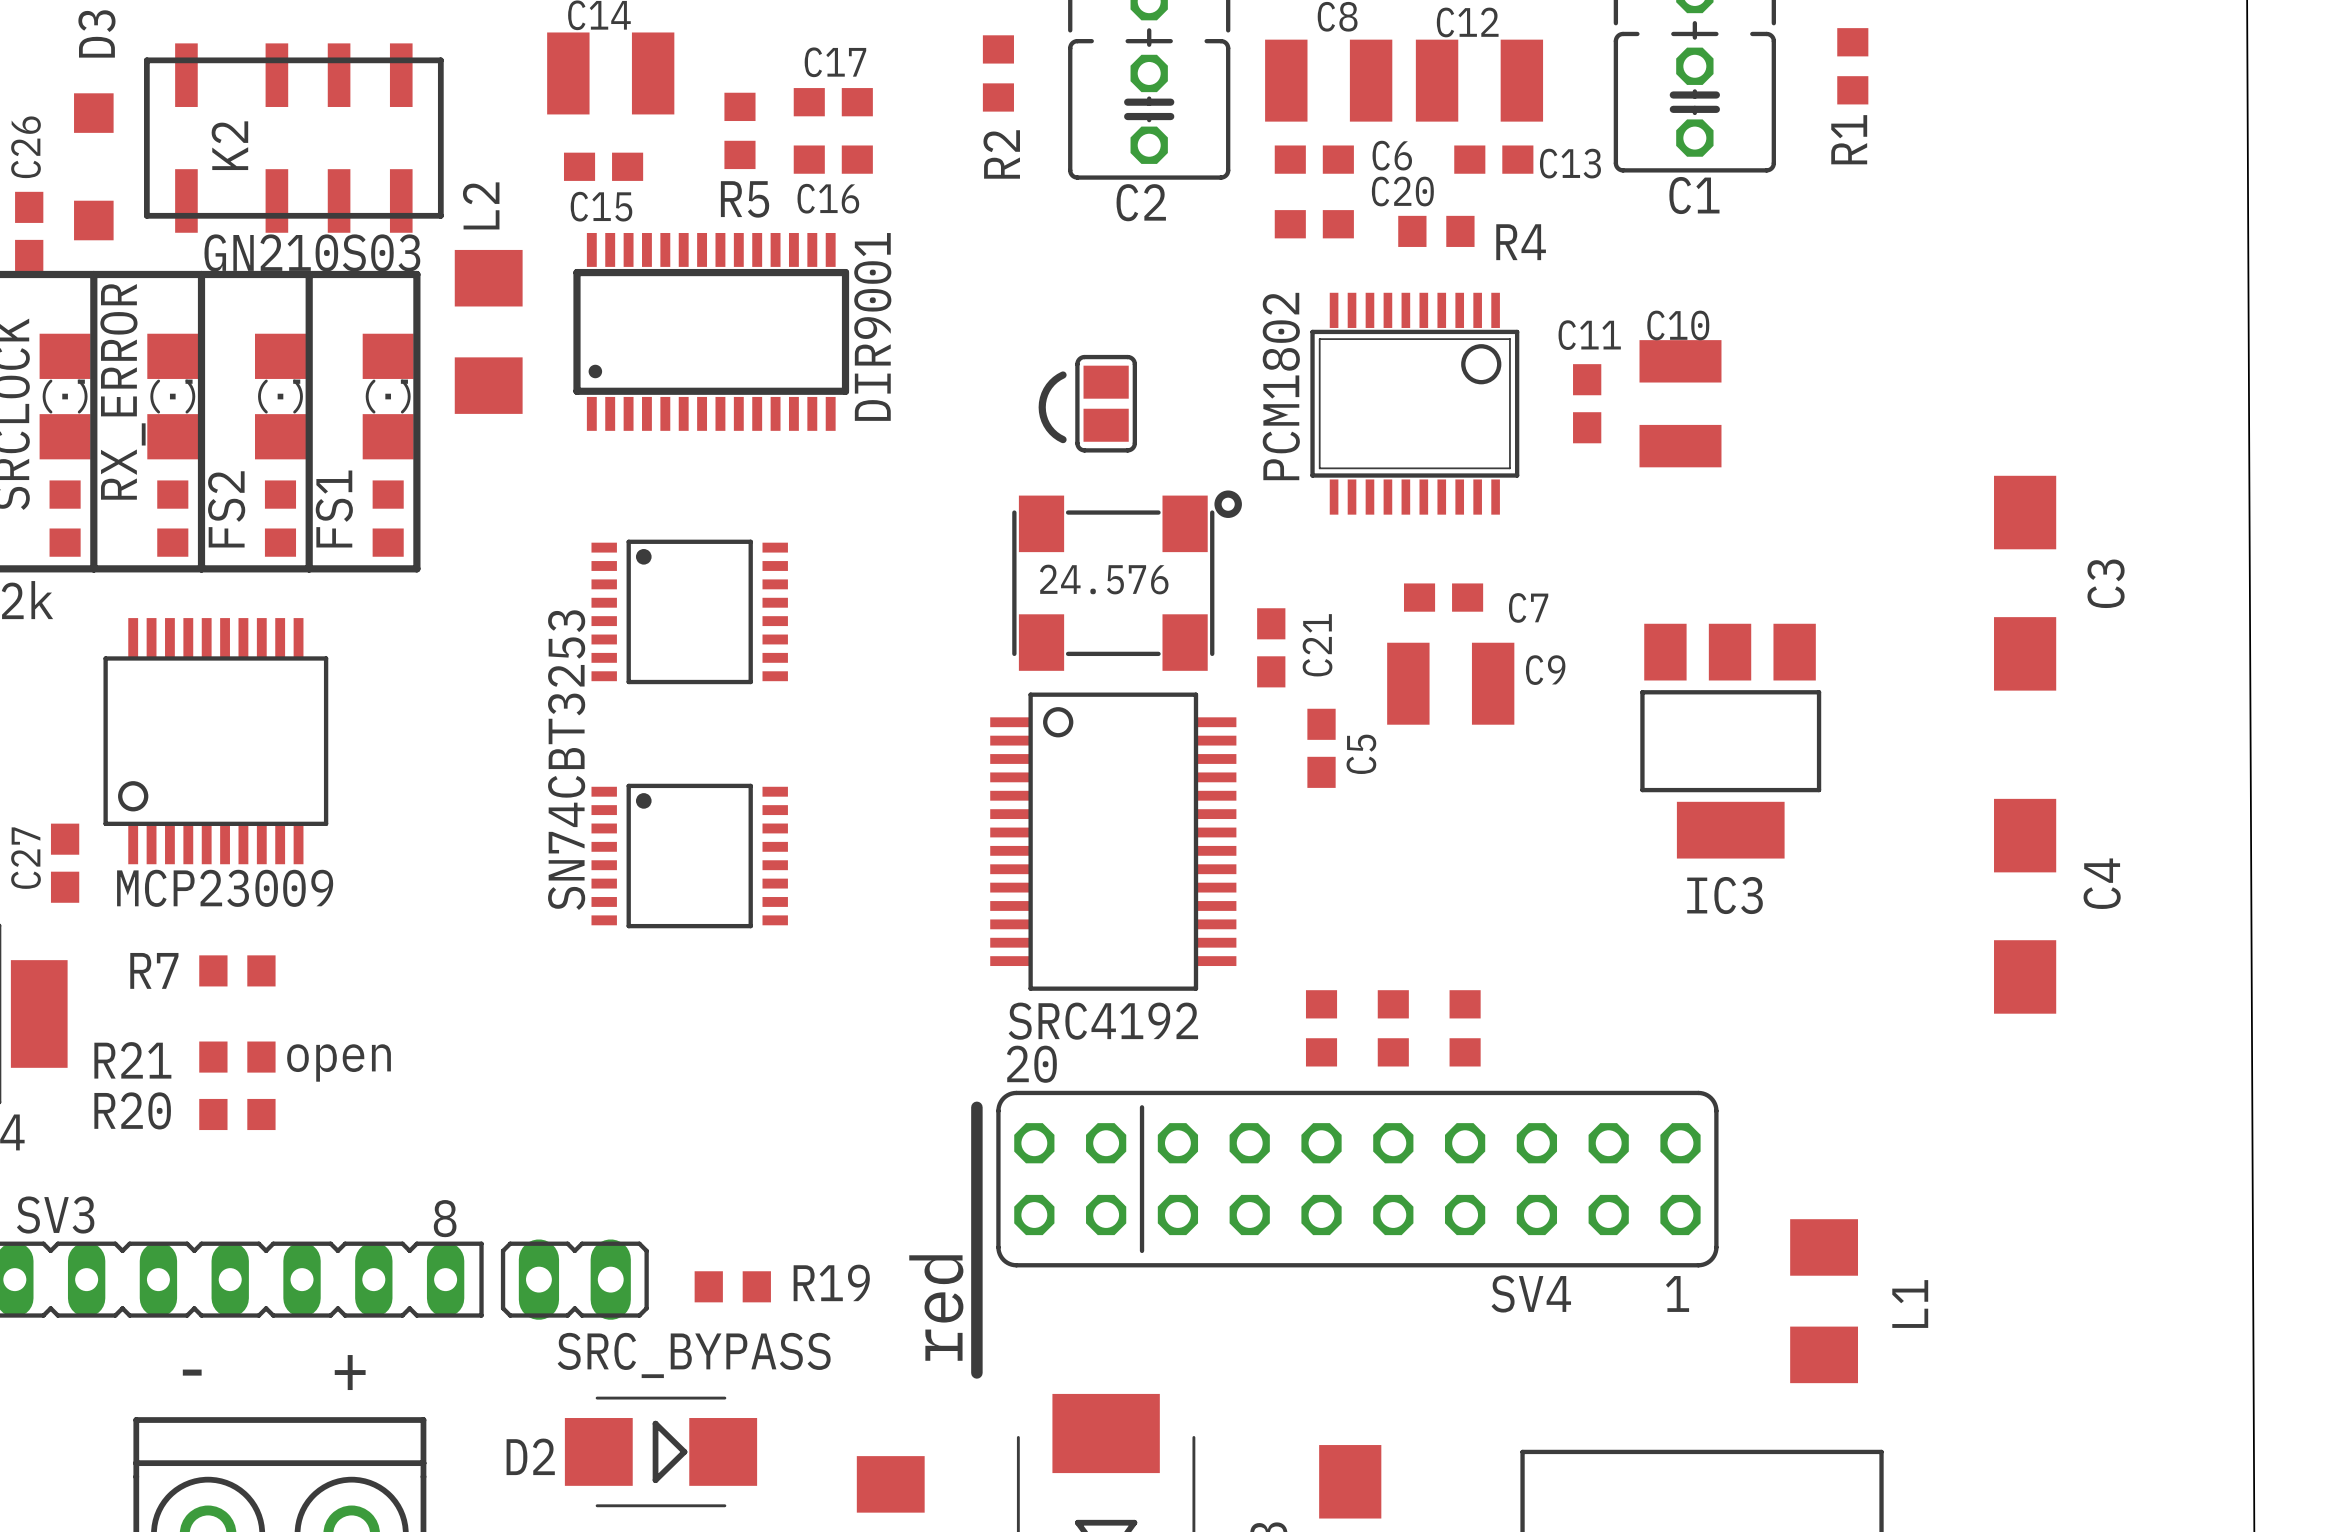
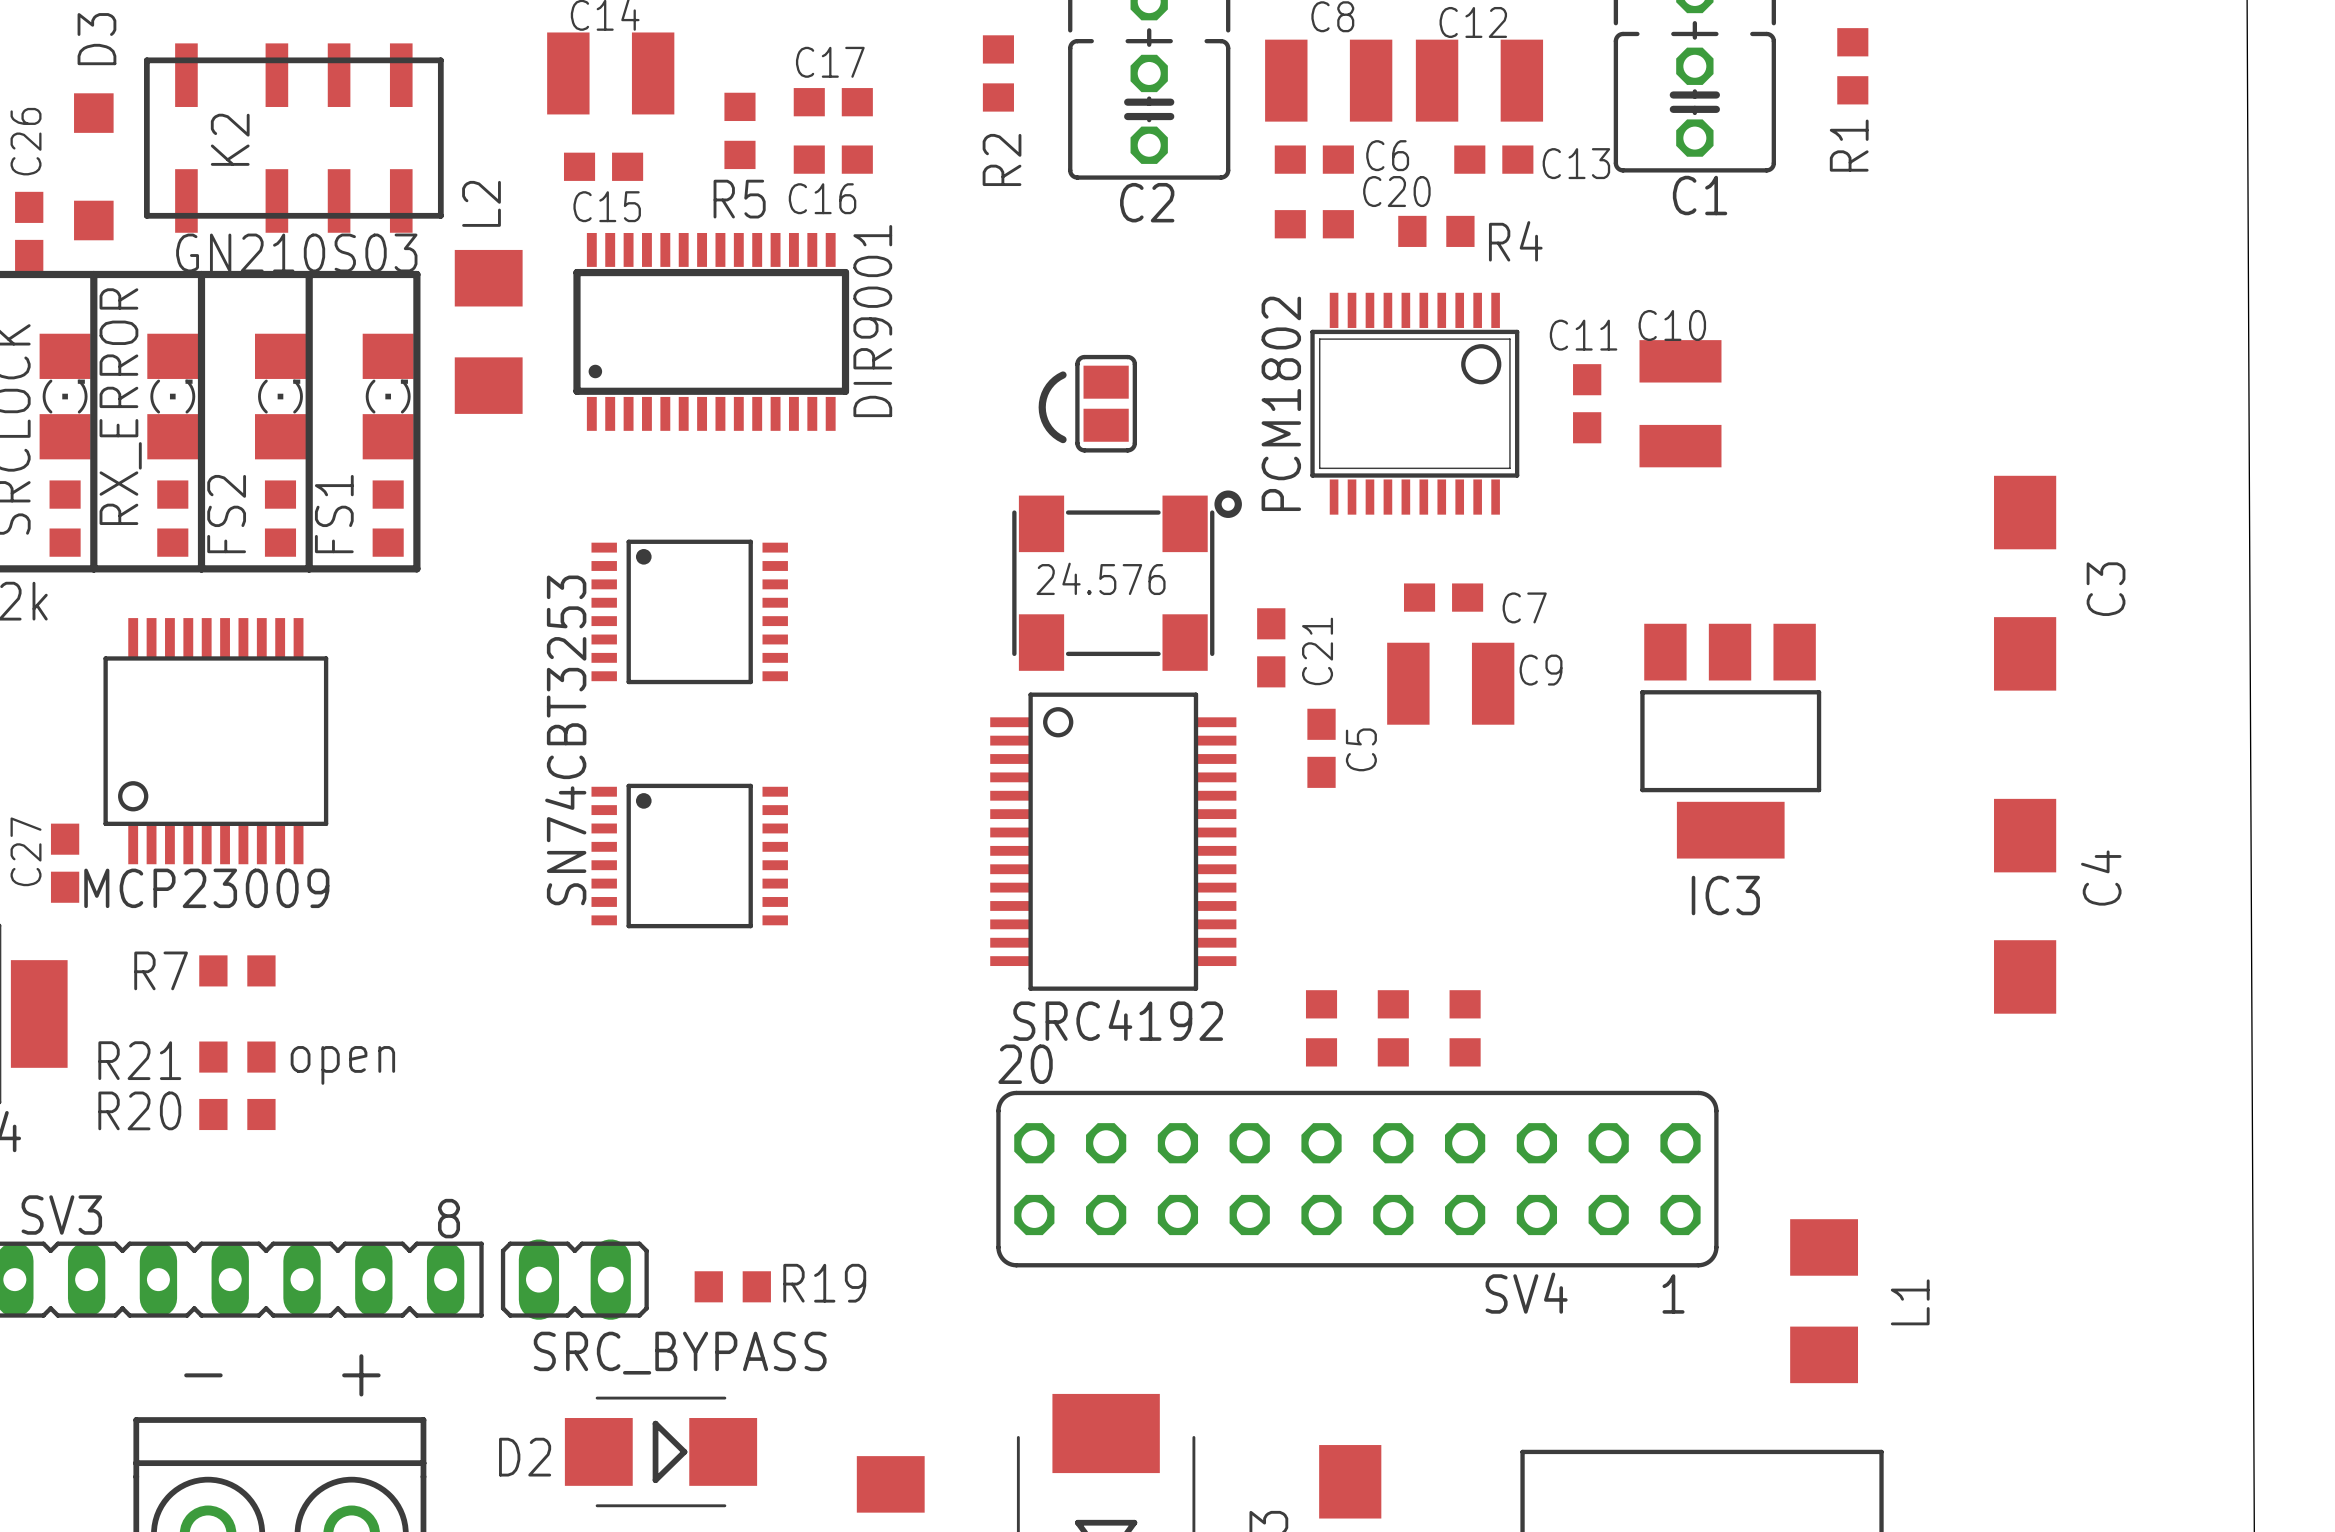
line: (976, 1107) (976, 1372) -> none
line: (1142, 1107) (1142, 1250) -> none
text: red (936, 1308) -> none

